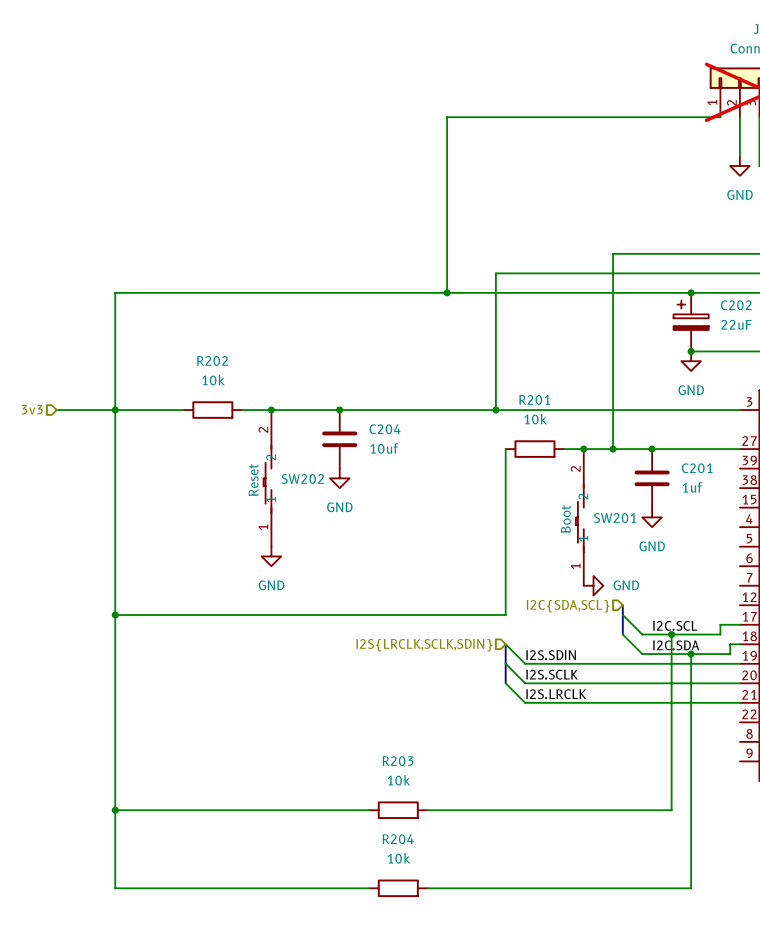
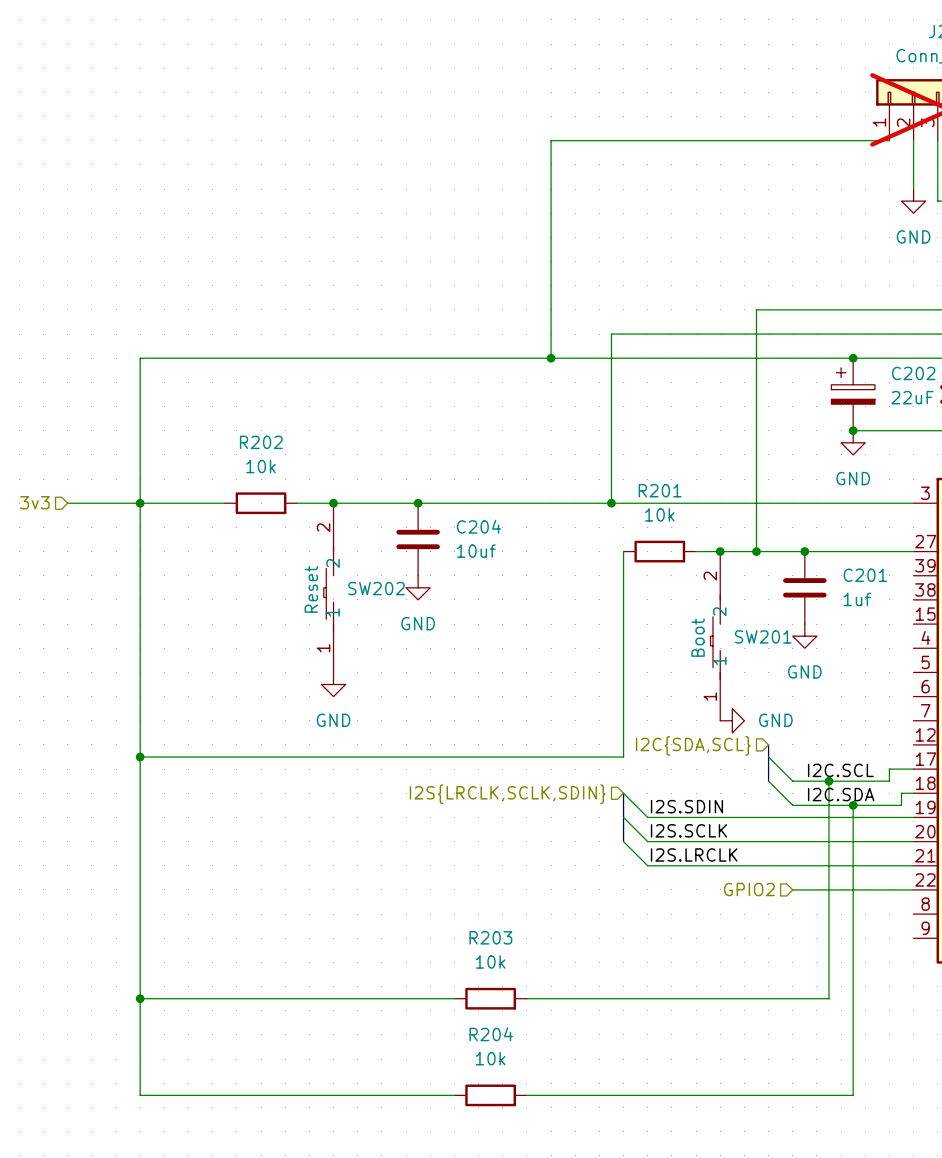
hierarchical label: none -> GPIO2 (749, 889)
wire: none -> (792, 889) (913, 889)

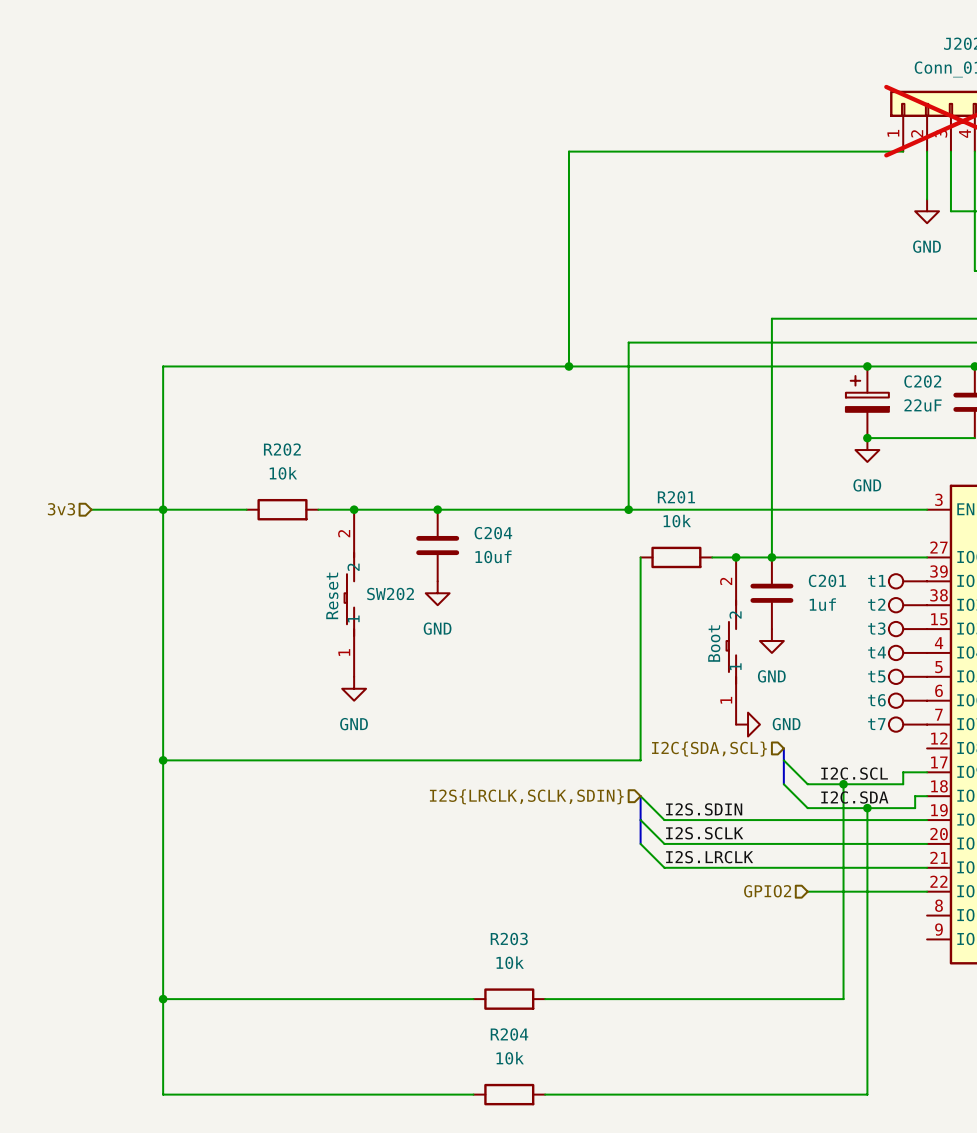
junction: (804, 551) -> none
part: none -> (907, 581)
C201 position: (804, 587) -> (771, 593)
part: none -> (907, 605)
part: none -> (907, 629)
SW201 name: SW201 (763, 636) -> none
power symbol position: GND (804, 636) -> GND (771, 641)
part: none -> (907, 652)
part: none -> (907, 676)
part: none -> (907, 700)
part: none -> (907, 724)

